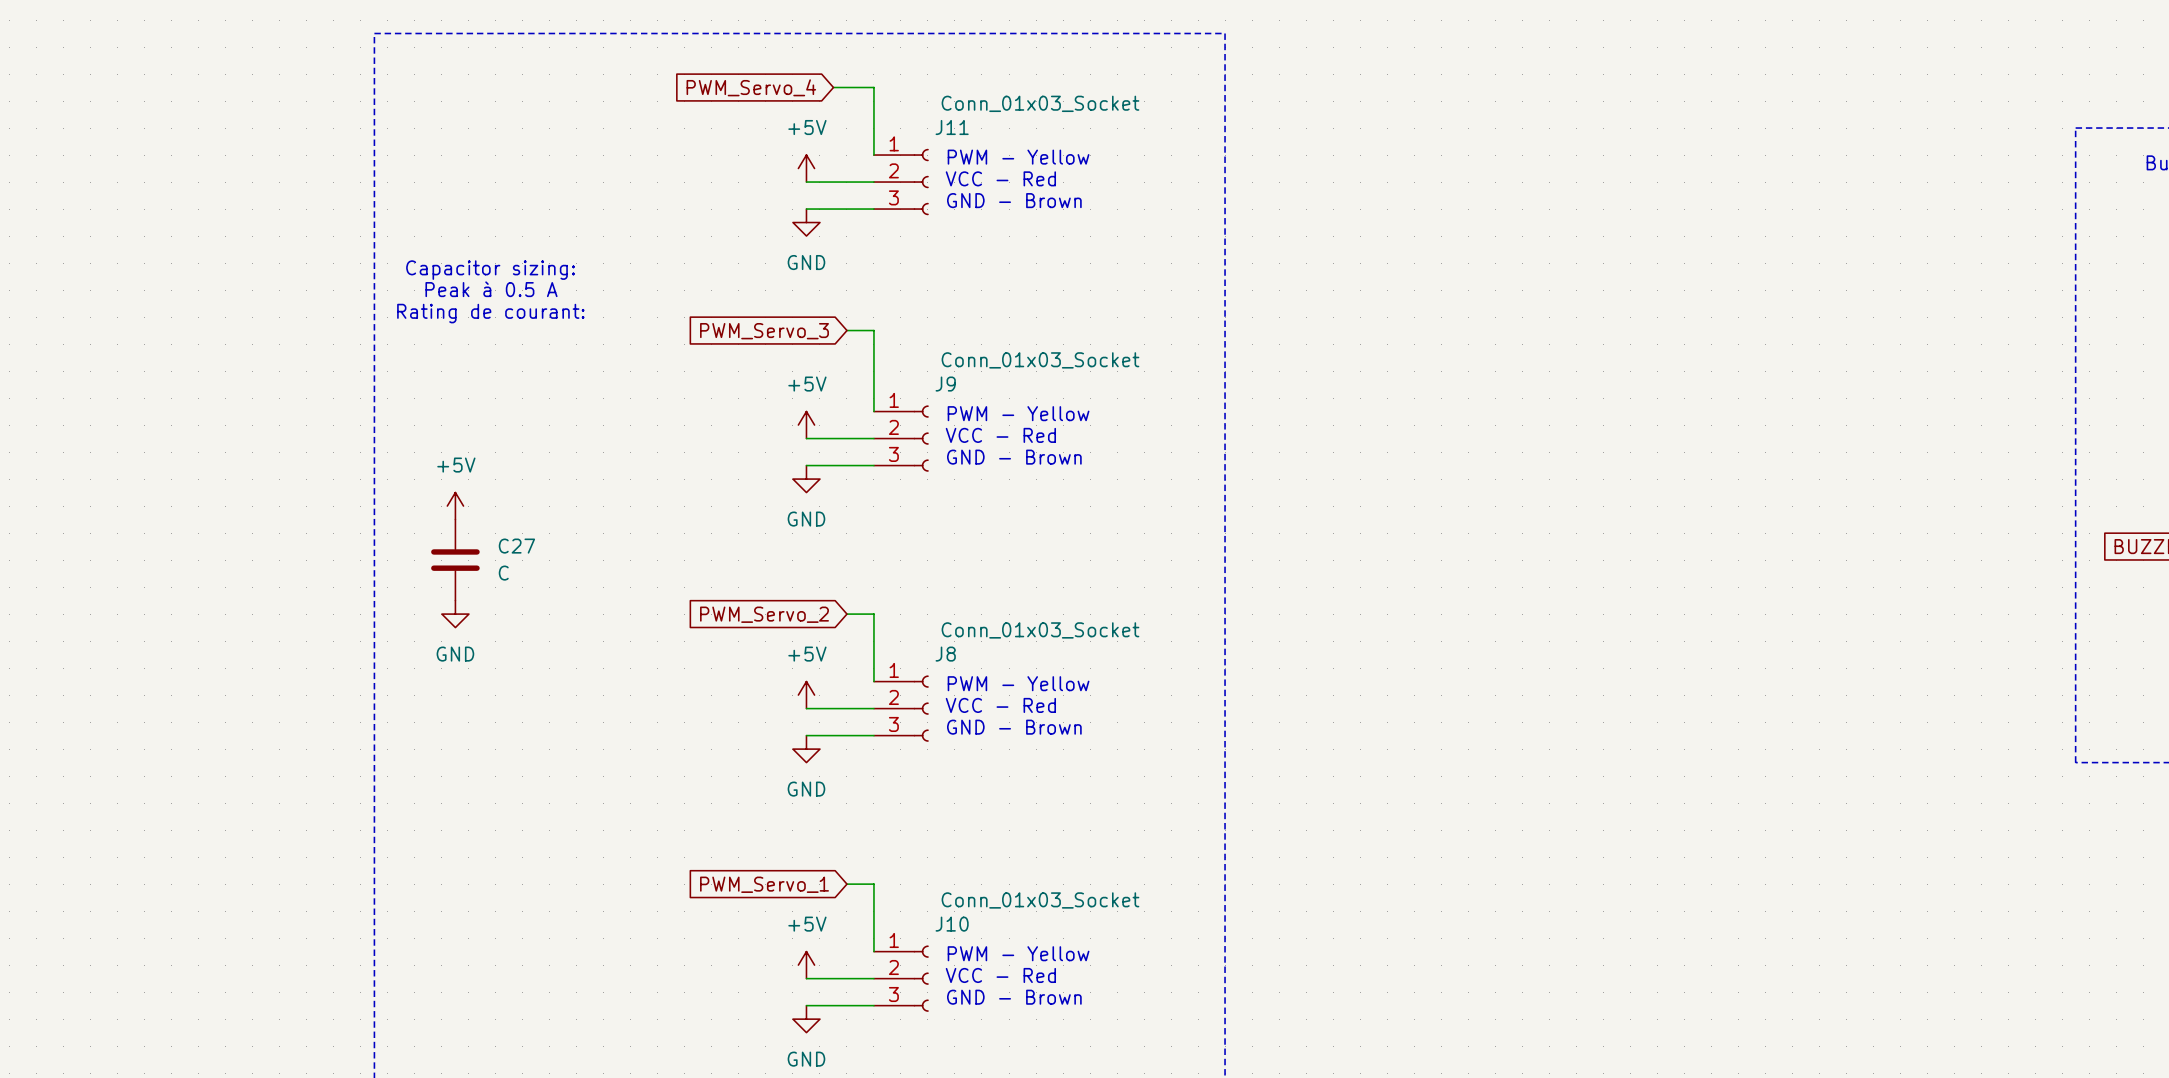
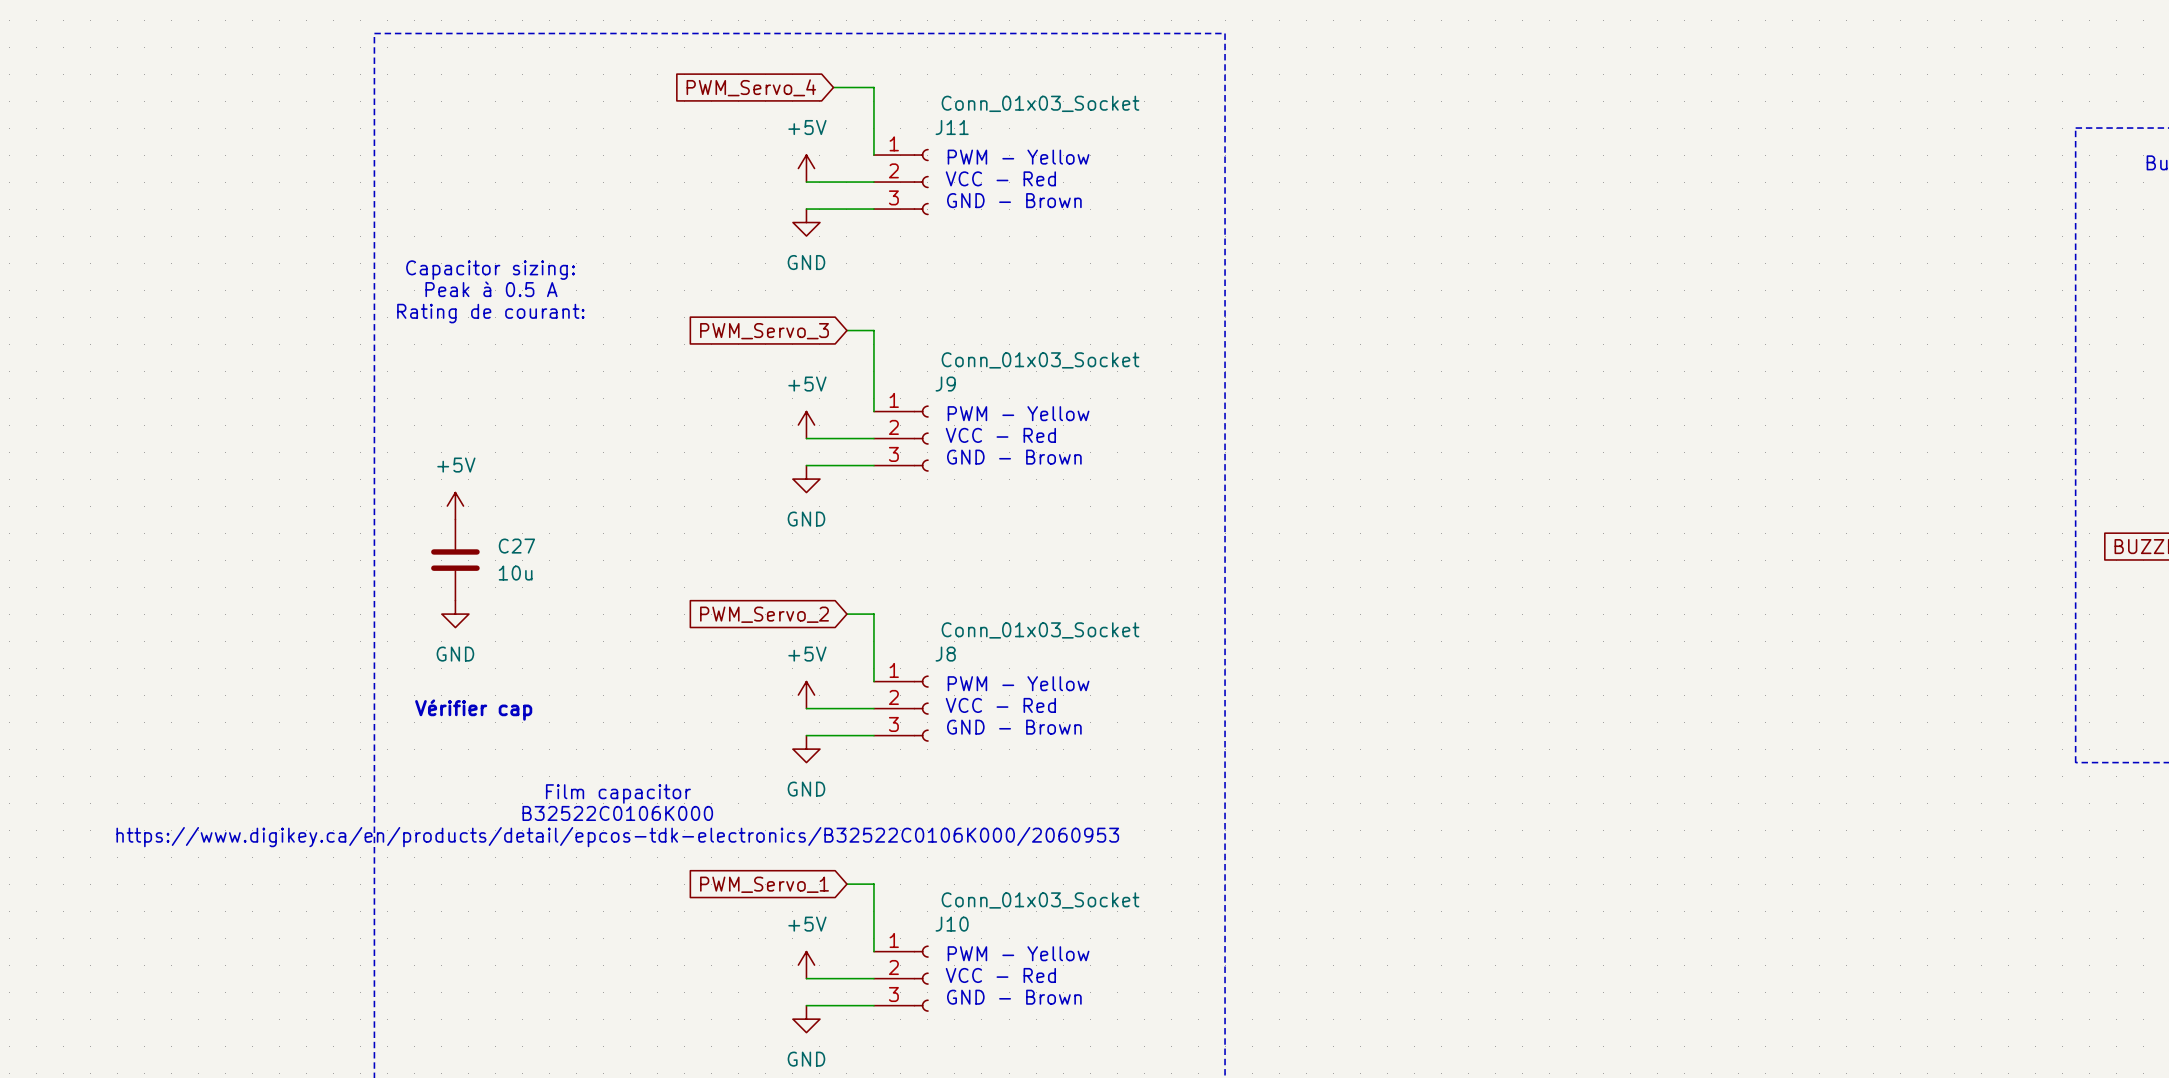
C27 value: C (503, 573) -> 10u (515, 573)
text: none -> Vérifier cap (473, 710)
text: none -> Film capacitor (618, 793)
text: none -> B32522C0106K000 (617, 813)
text: none -> https://www.digikey.ca/en/products/detail/epcos-tdk-electronics/B32522C0106K000/2060953 (617, 837)

